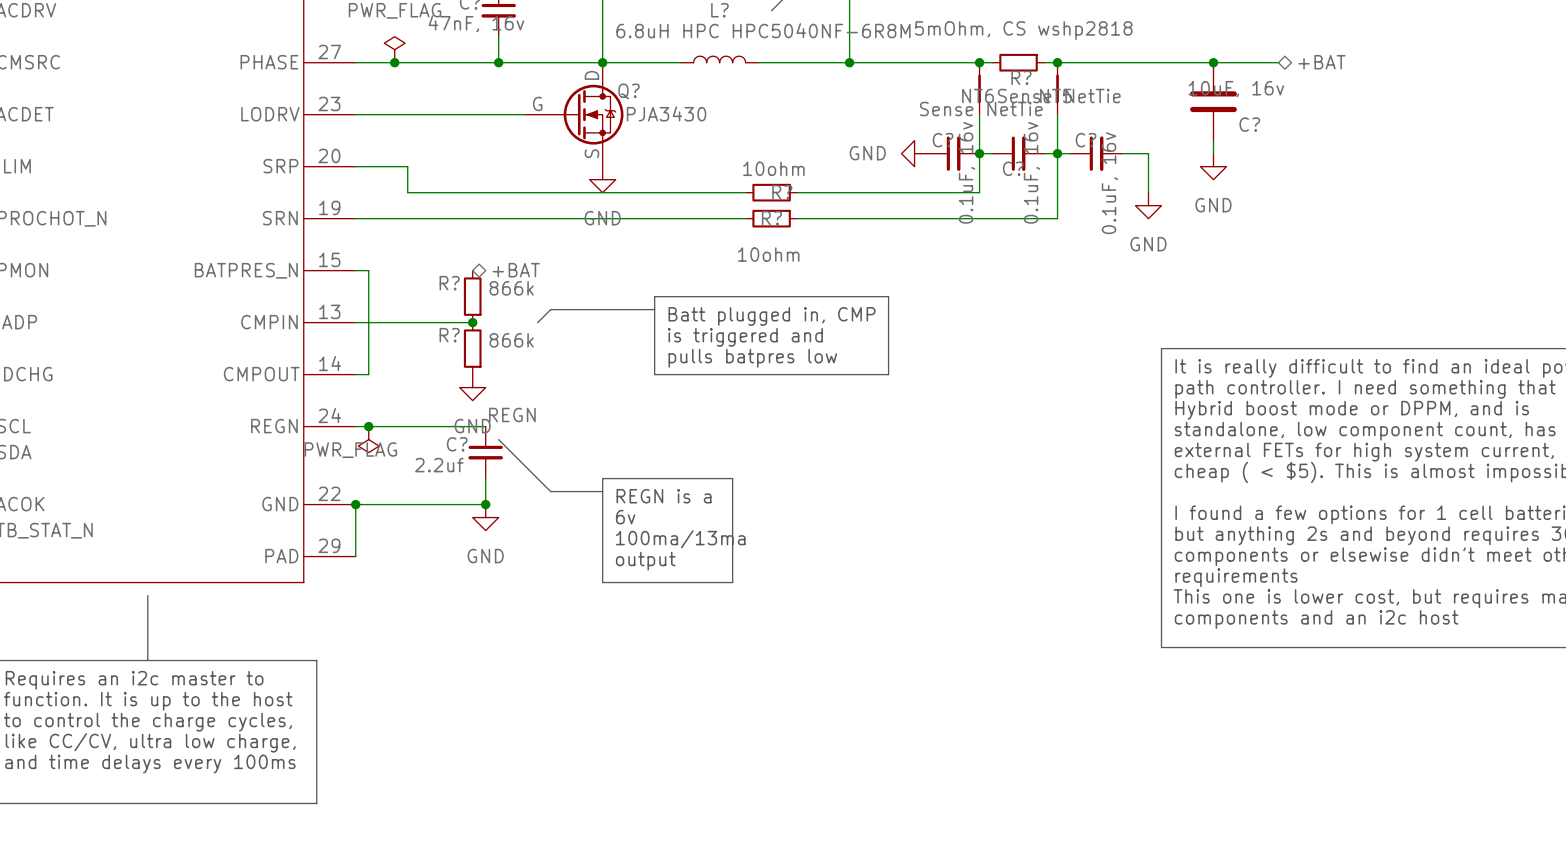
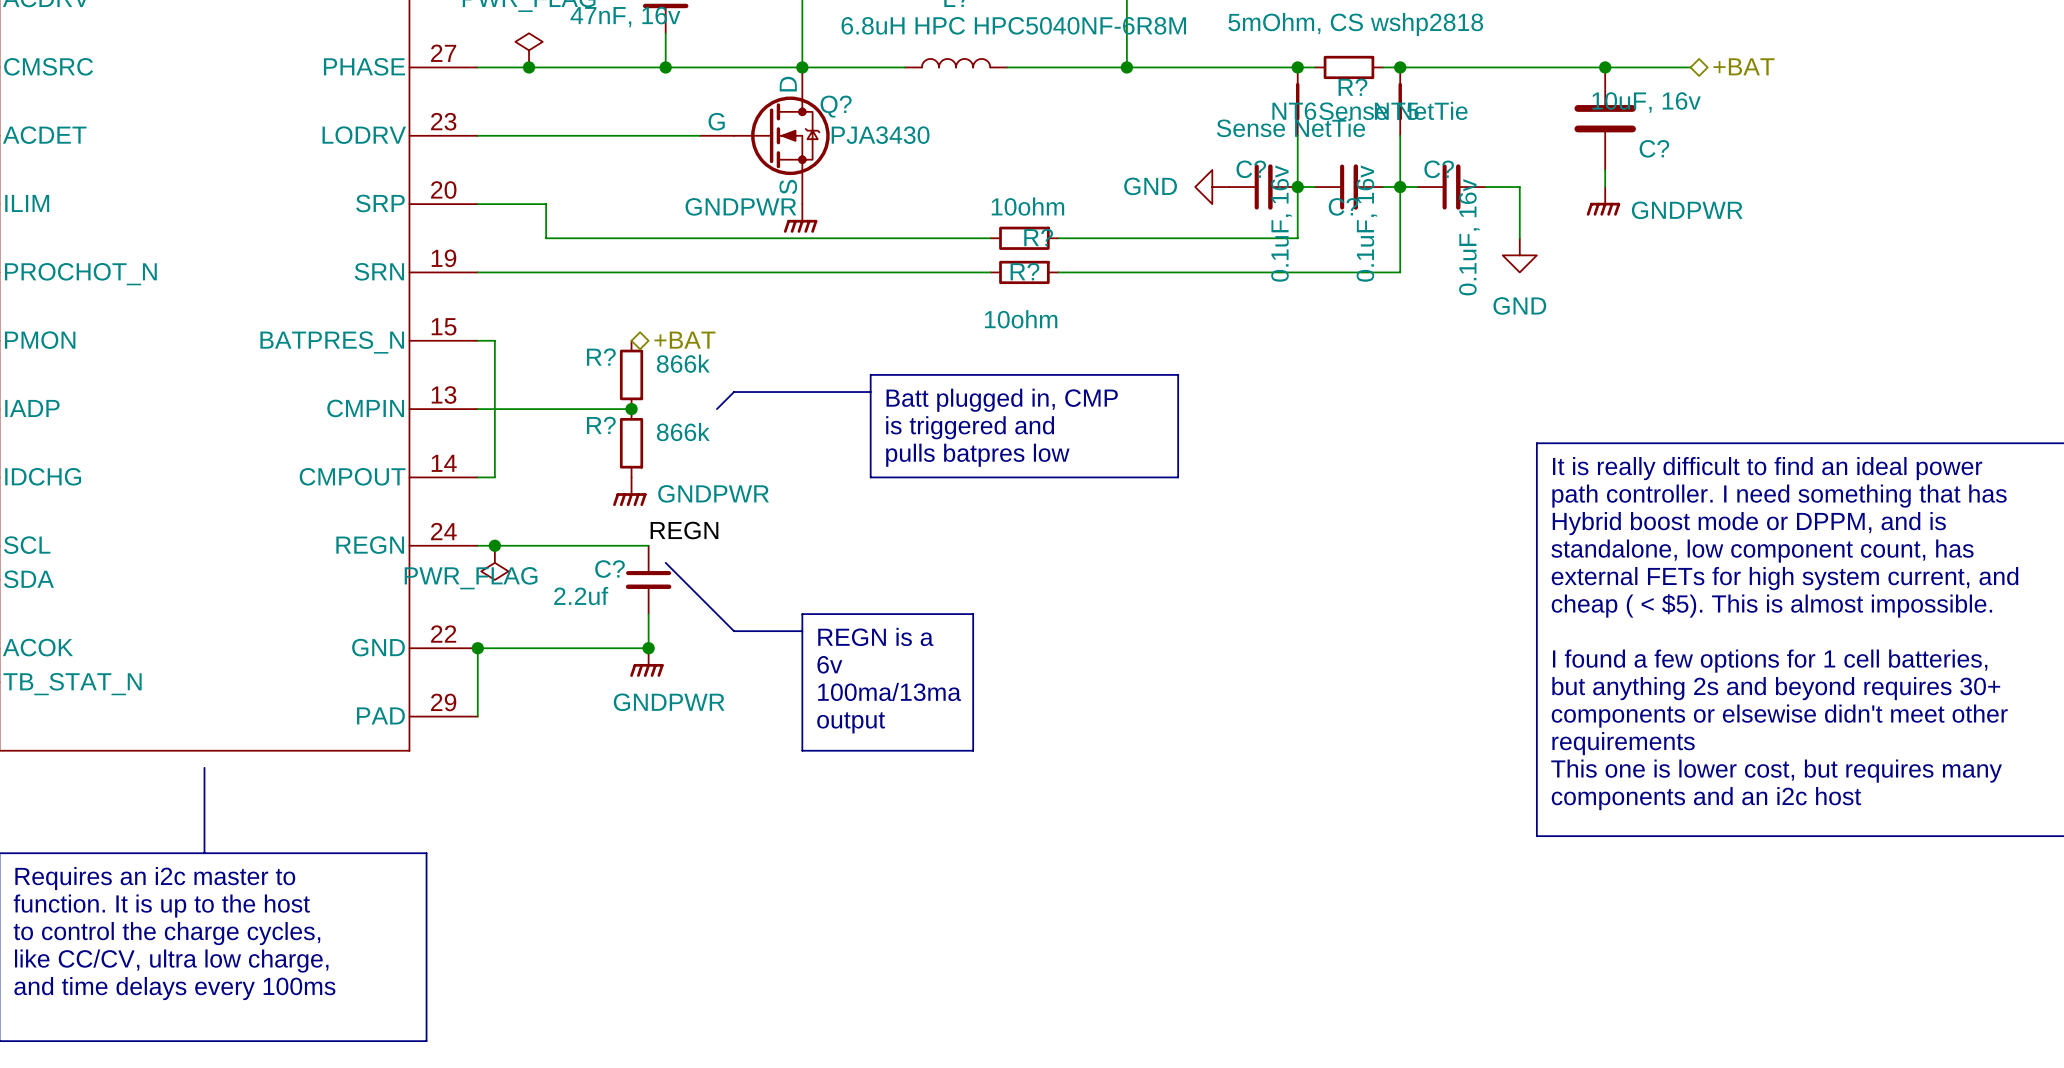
power symbol: GND (1213, 166) -> GNDPWR (1603, 201)
power symbol: GND (602, 179) -> GNDPWR (800, 218)
power symbol: GND (472, 387) -> GNDPWR (629, 491)
power symbol: GND (485, 517) -> GNDPWR (646, 662)

